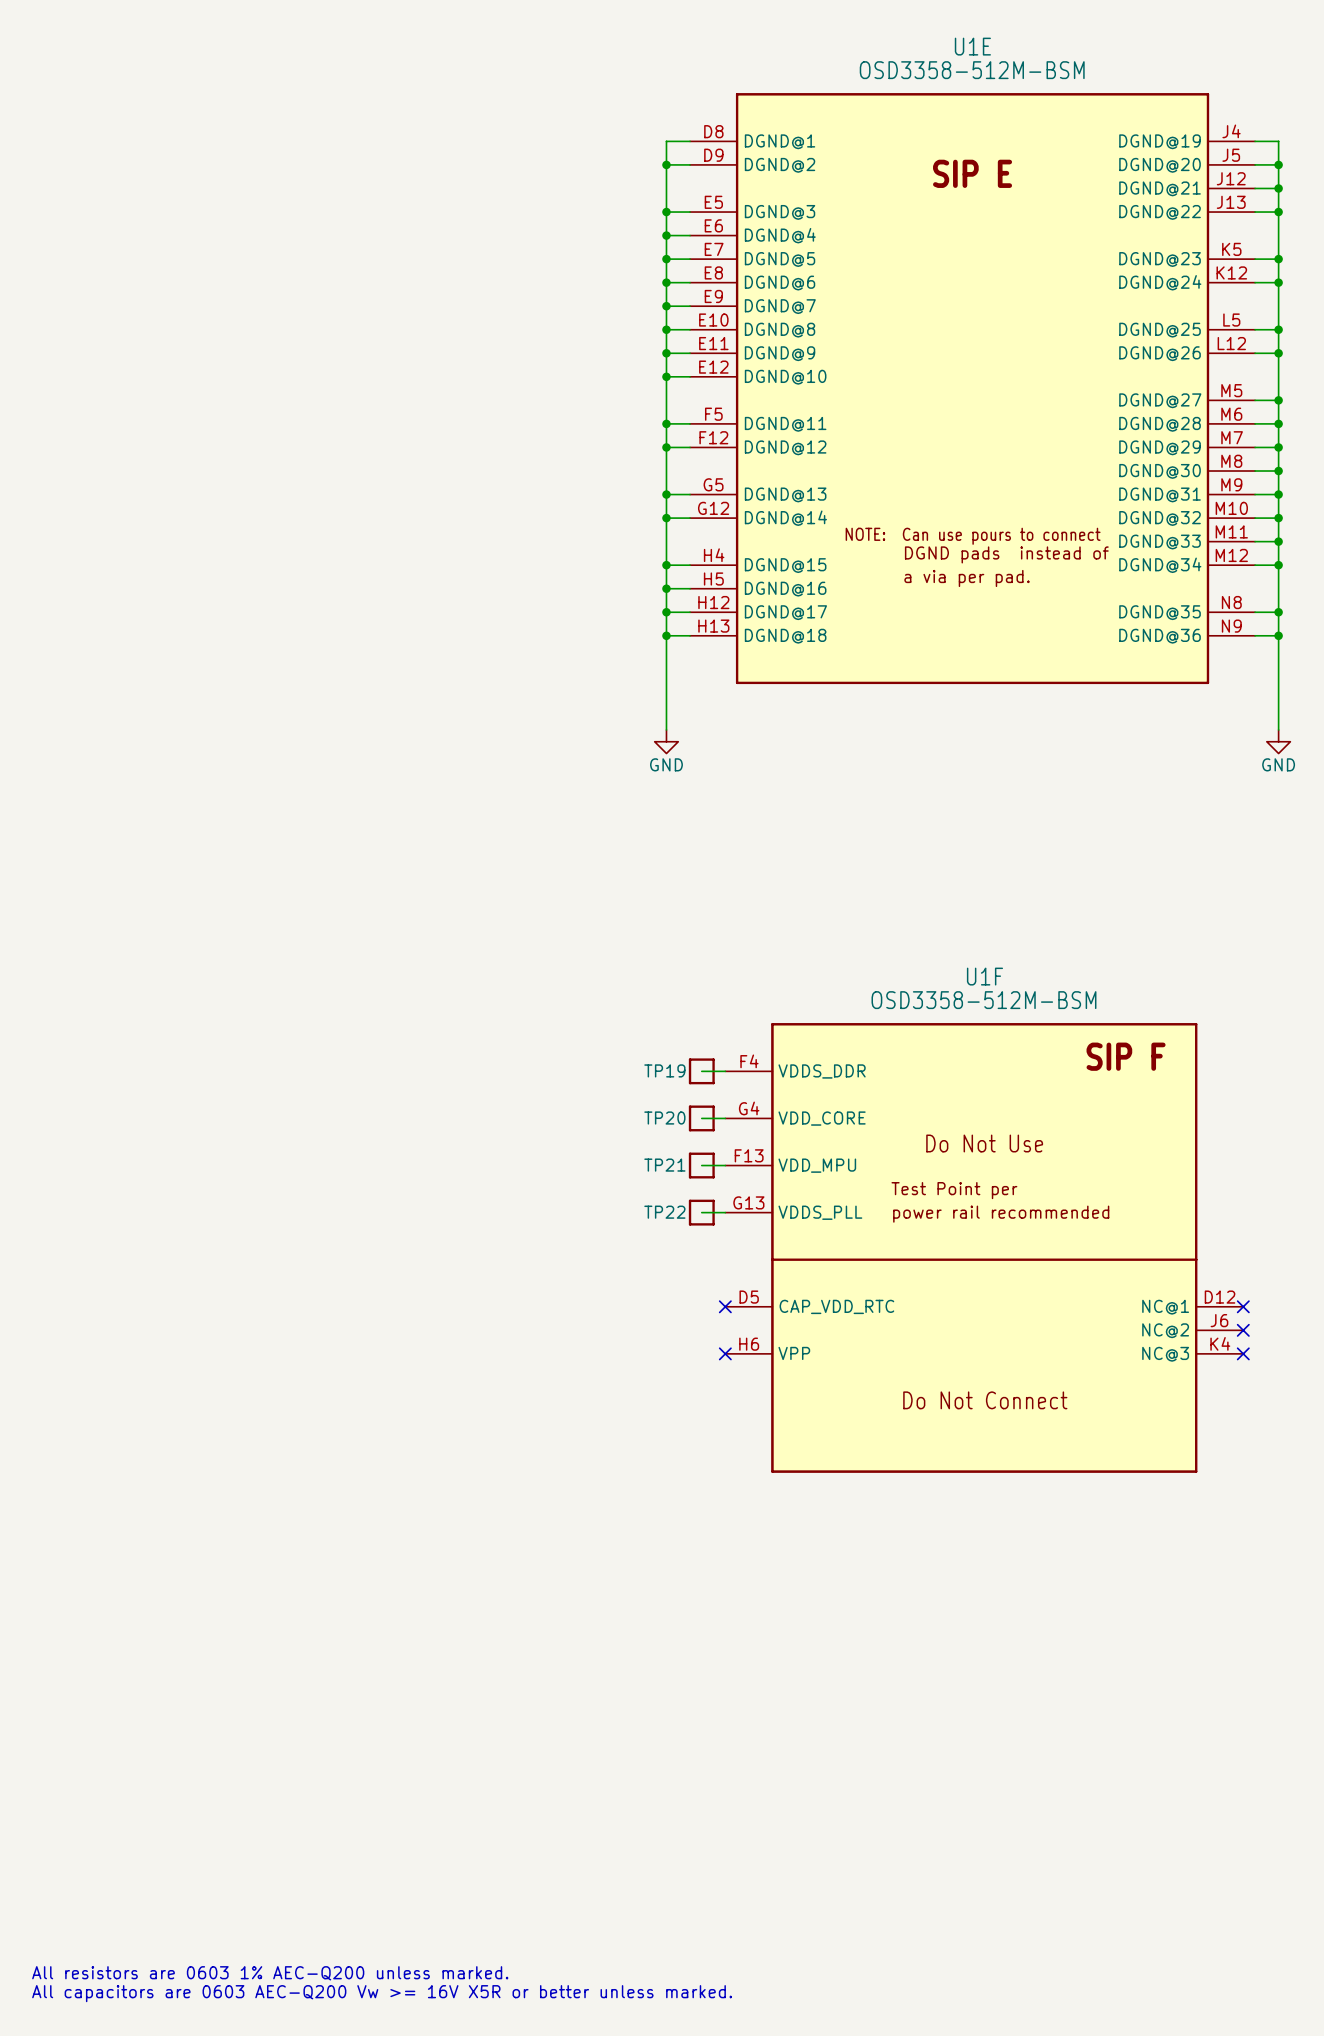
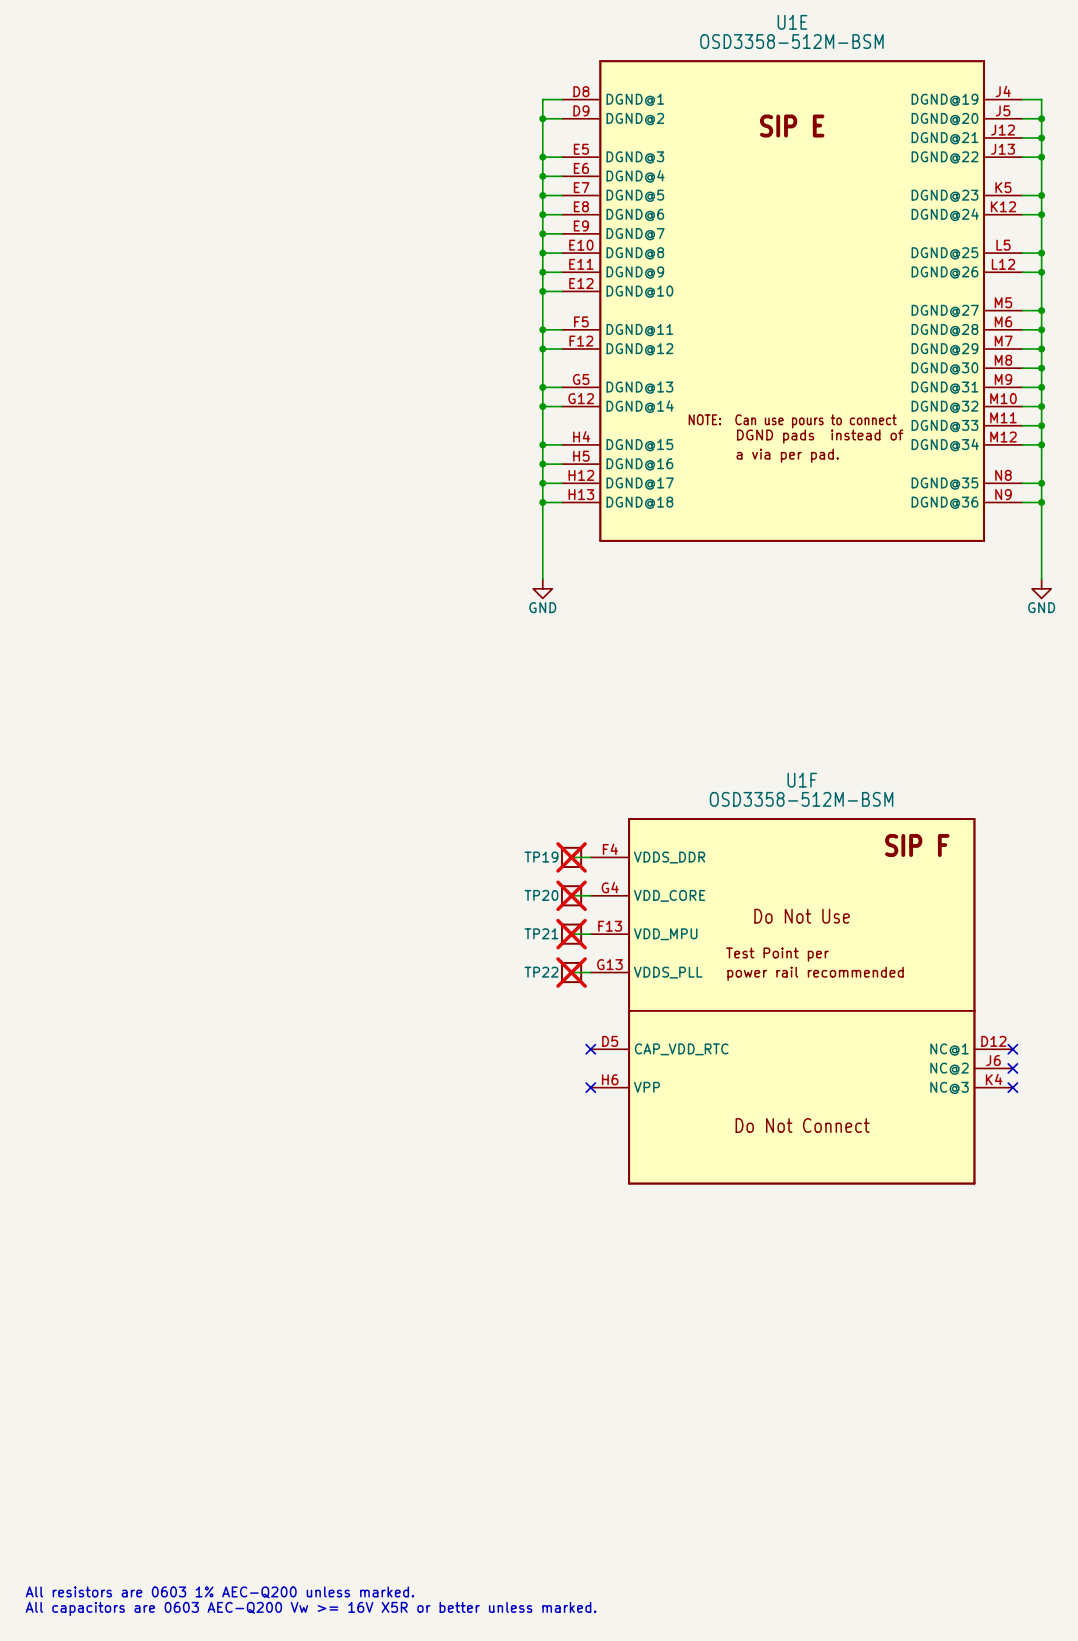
TP19 do-not-place cross: none -> (571, 857)
TP20 do-not-place cross: none -> (571, 895)
TP21 do-not-place cross: none -> (571, 934)
TP22 do-not-place cross: none -> (571, 972)

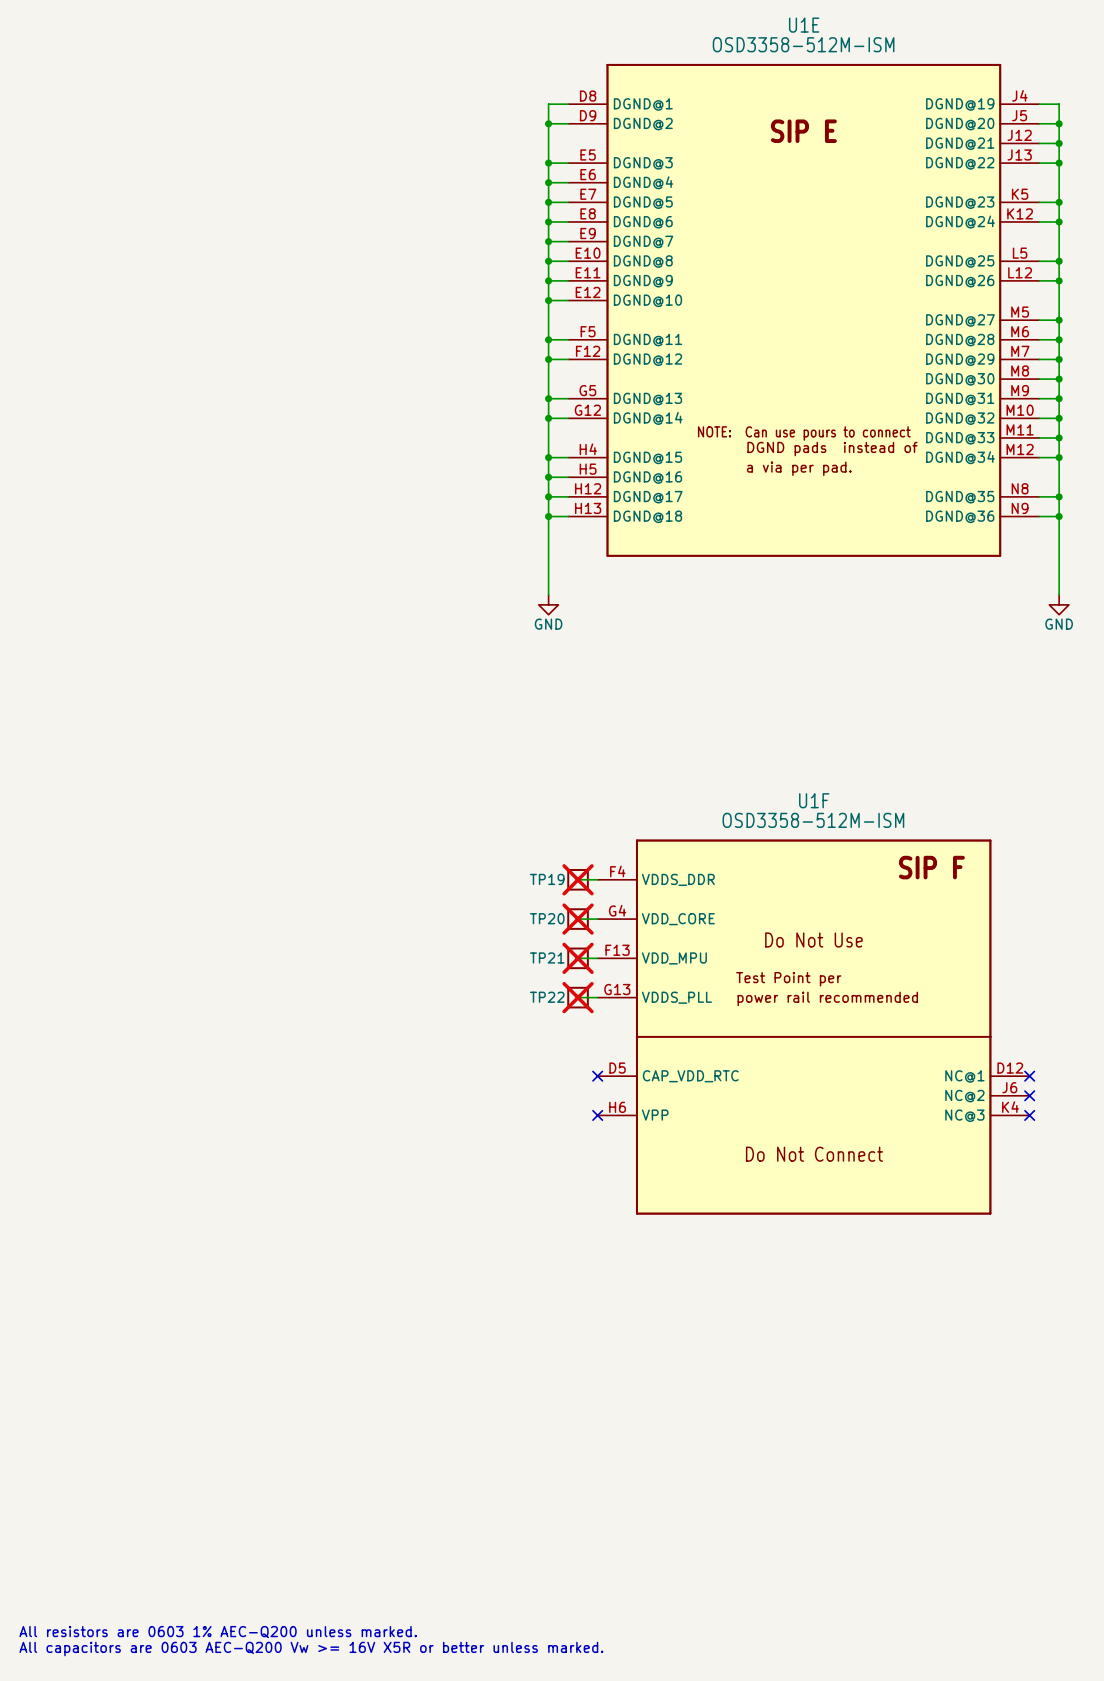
U1E value: OSD3358-512M-BSM (791, 41) -> OSD3358-512M-ISM (803, 44)
U1F value: OSD3358-512M-BSM (801, 799) -> OSD3358-512M-ISM (813, 820)

